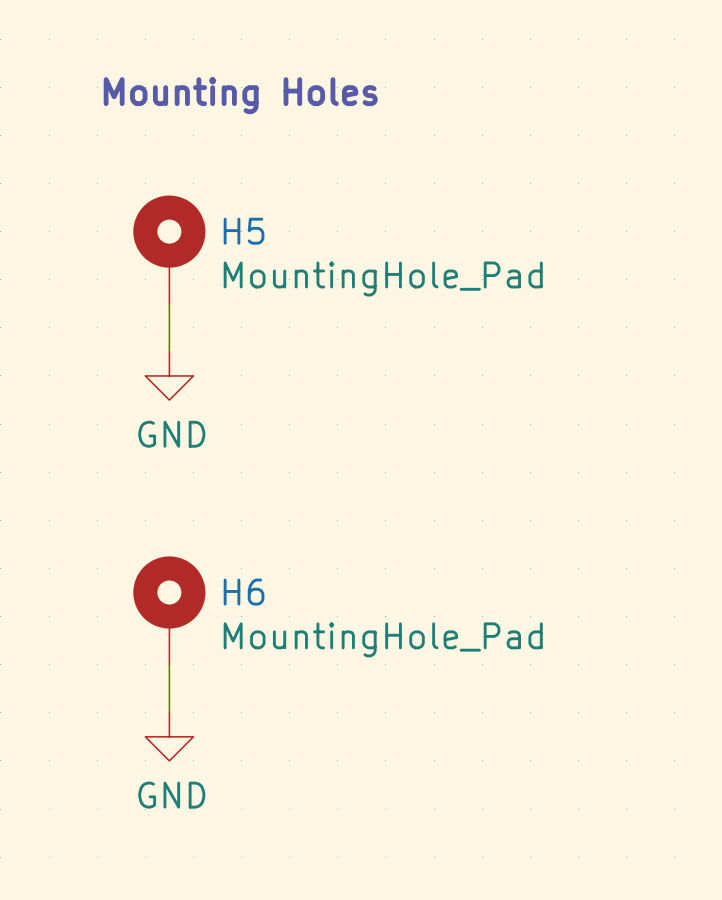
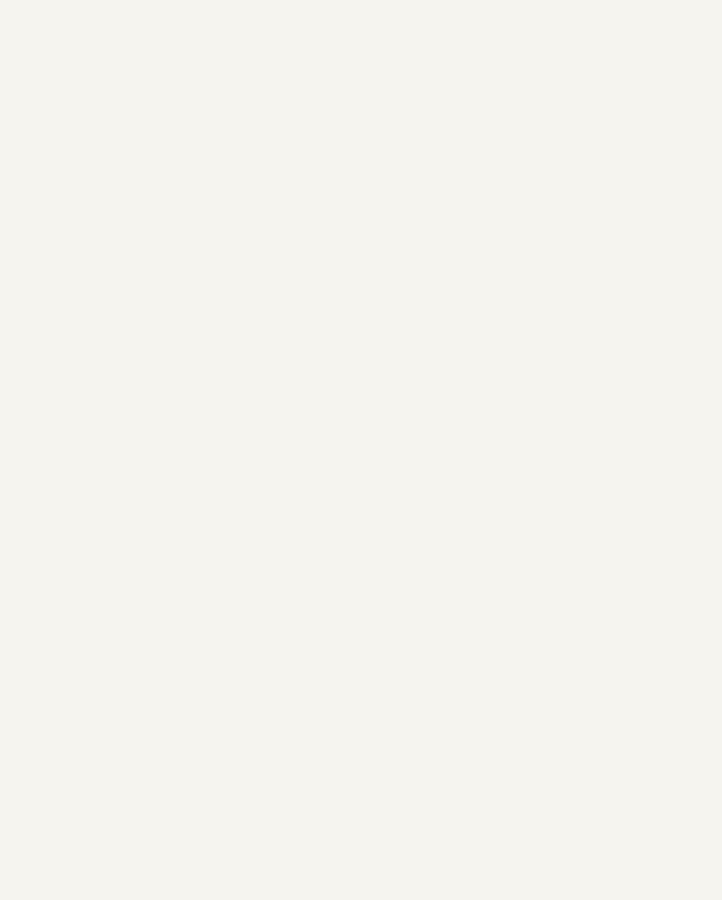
text: Mounting Holes (240, 95) -> none
H5: MountingHole_Pad (169, 249) -> none
wire: (169, 303) (169, 351) -> none
power symbol: GND (169, 375) -> none
H6: MountingHole_Pad (169, 610) -> none
wire: (169, 664) (169, 712) -> none
power symbol: GND (169, 736) -> none

